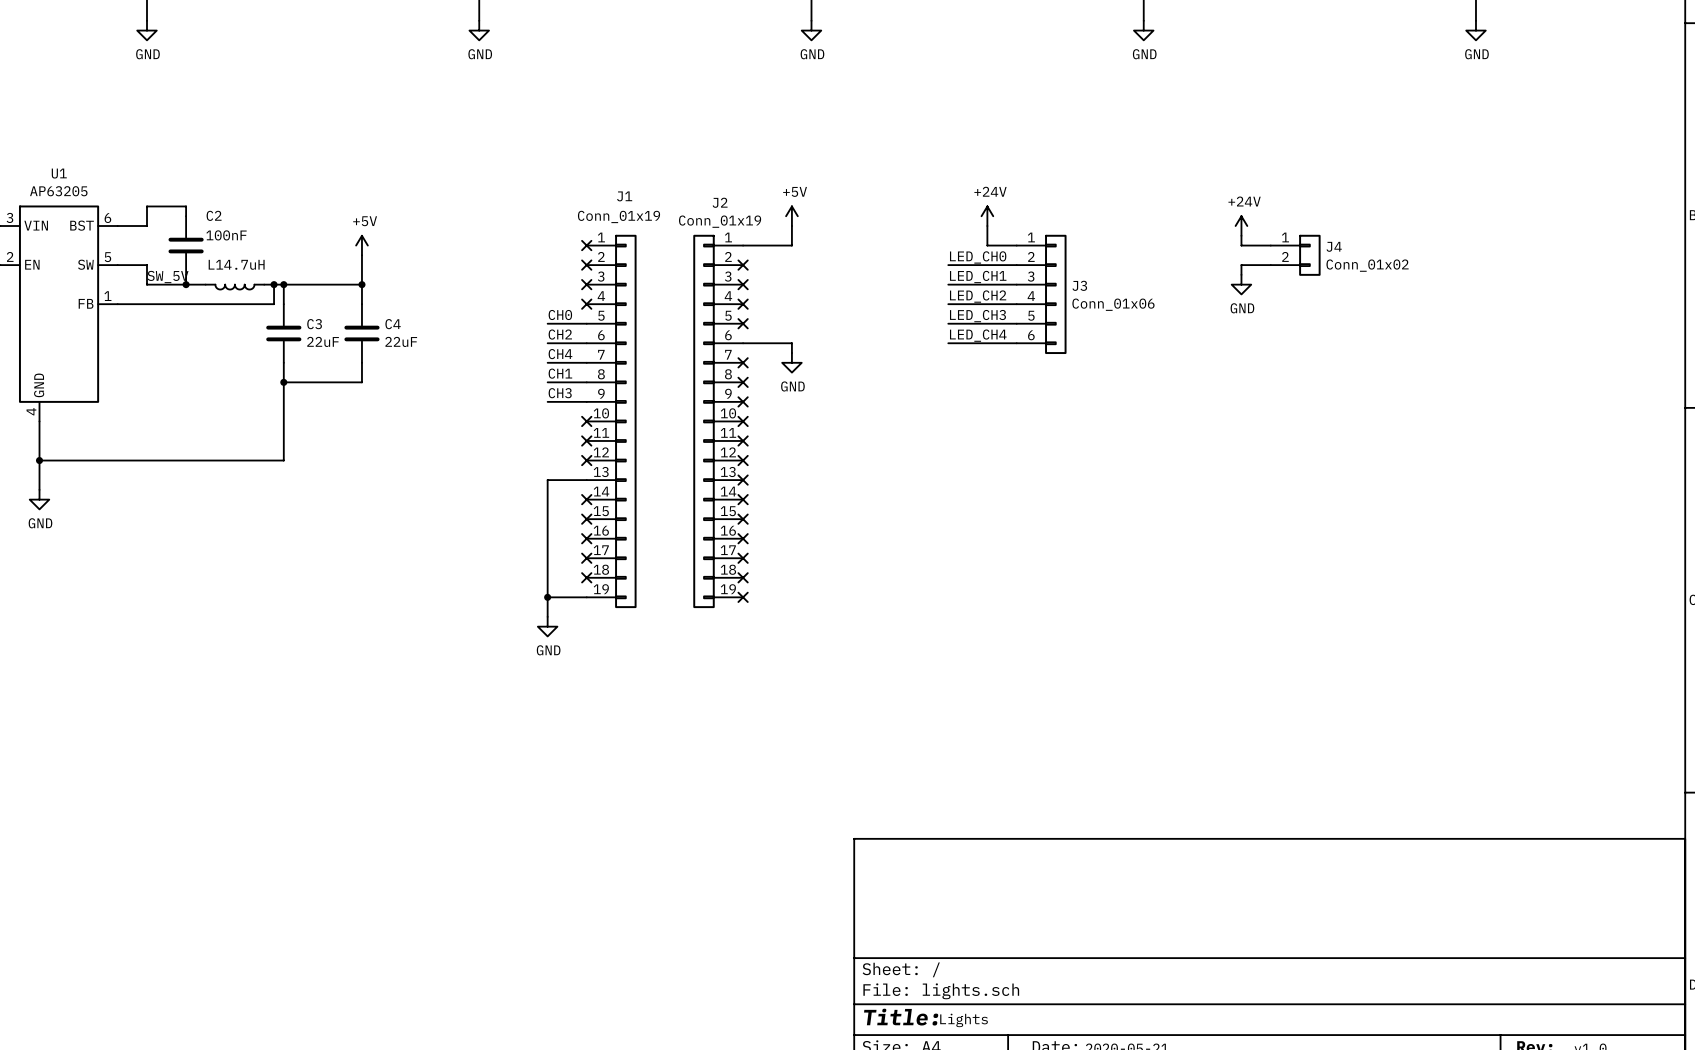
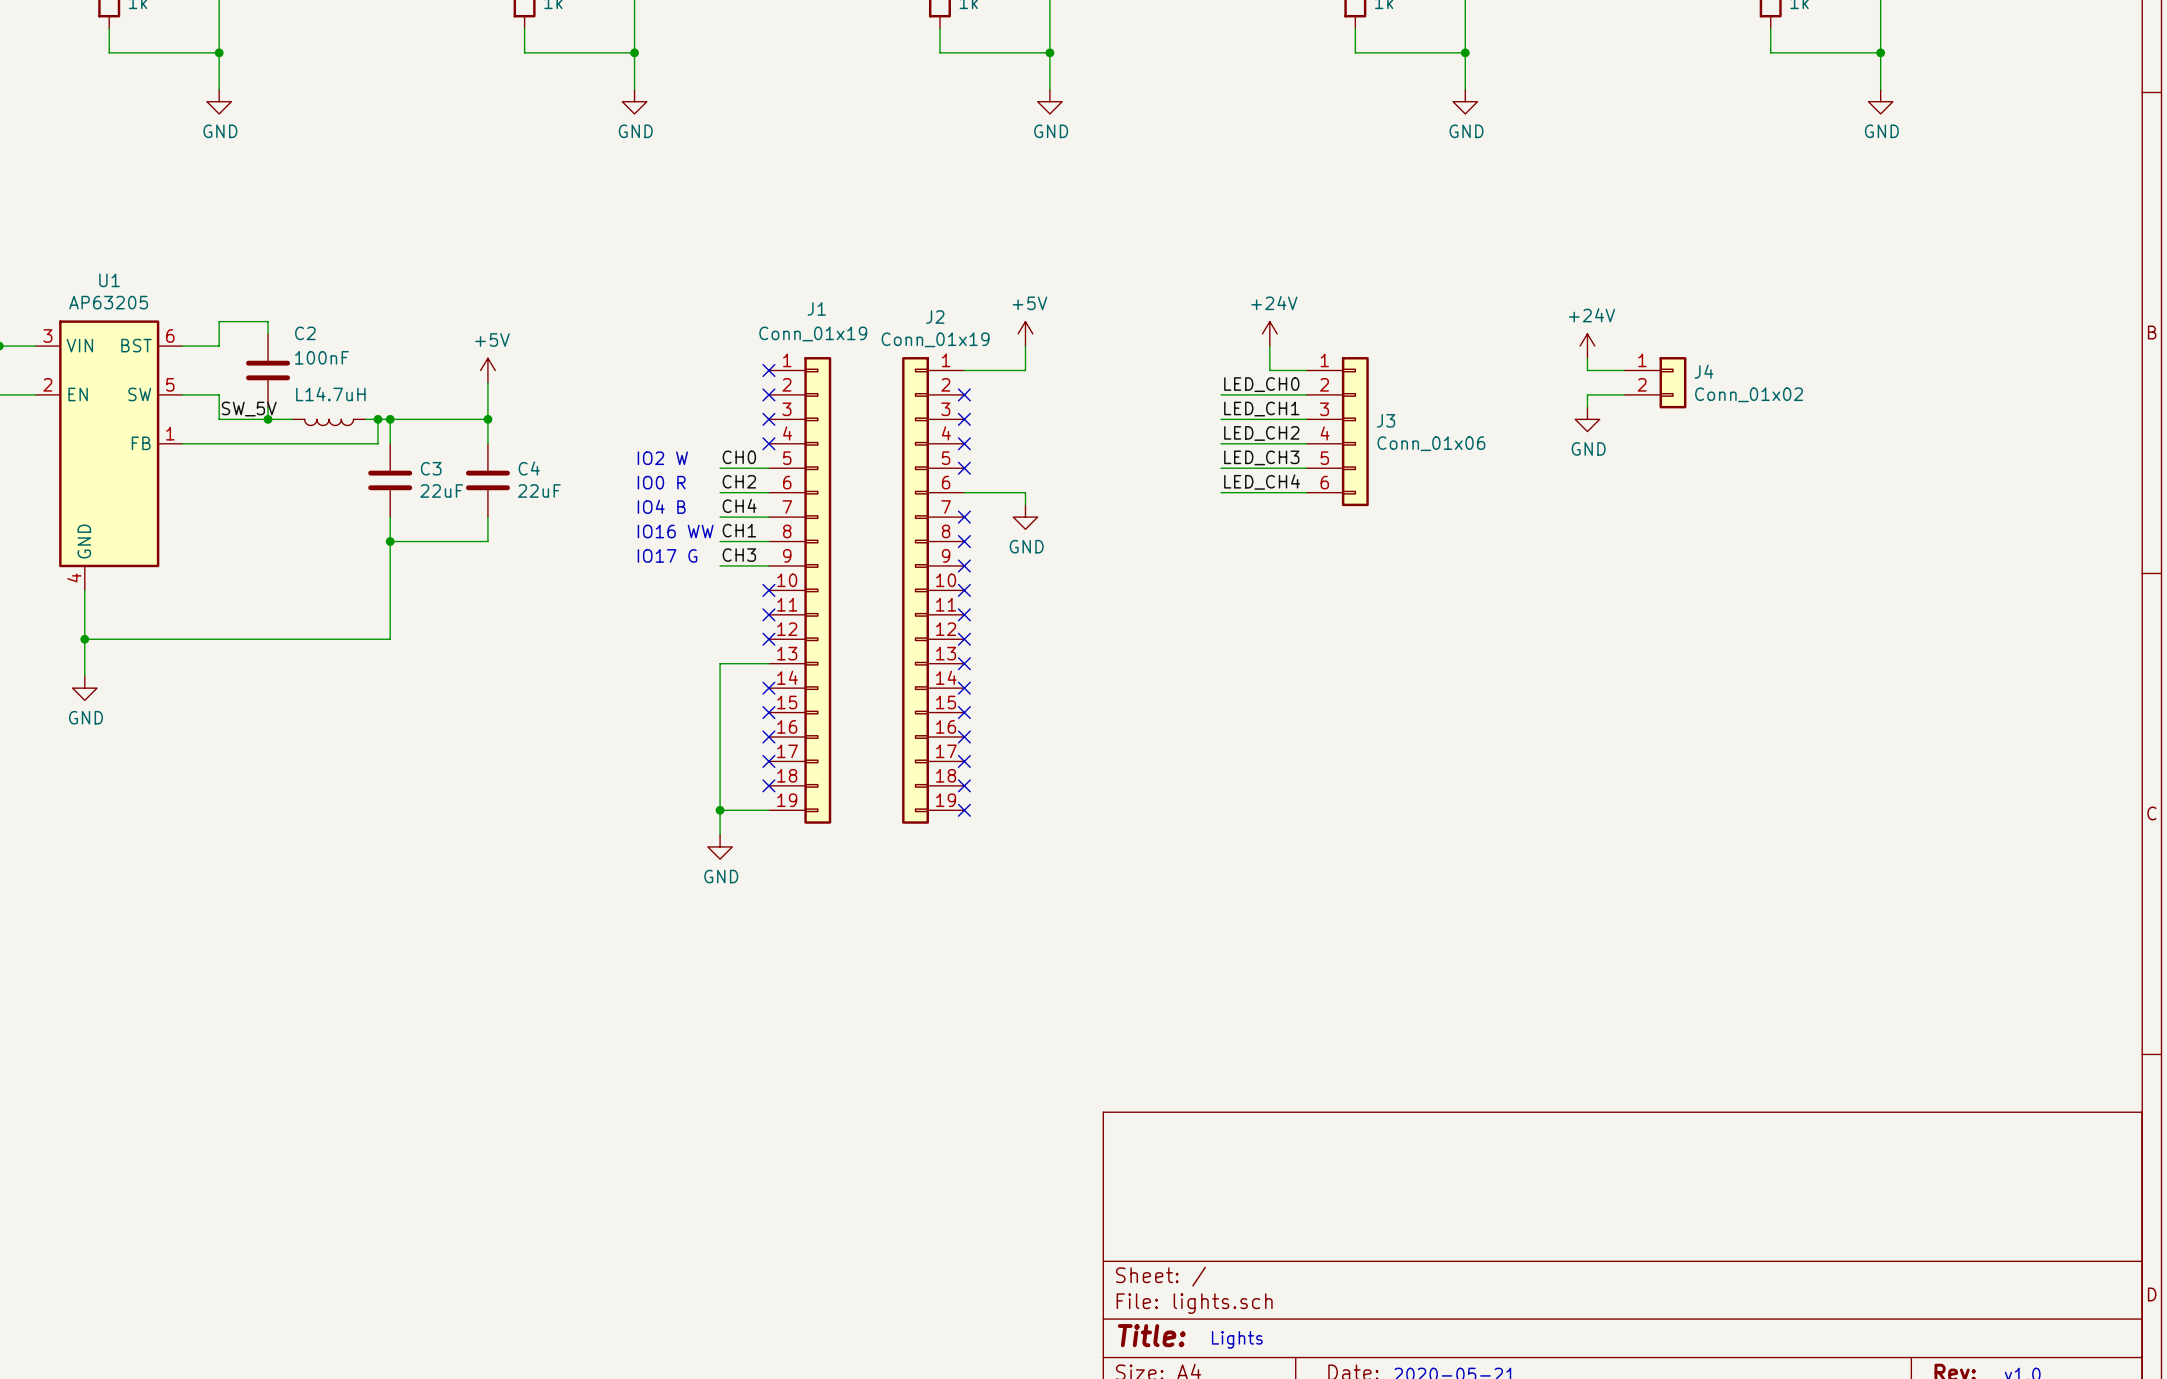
text: none -> IO2 W (662, 458)
text: none -> IO0 R (661, 482)
text: none -> IO4 B (661, 506)
text: none -> IO16 WW (675, 531)
text: none -> IO17 G (667, 555)

